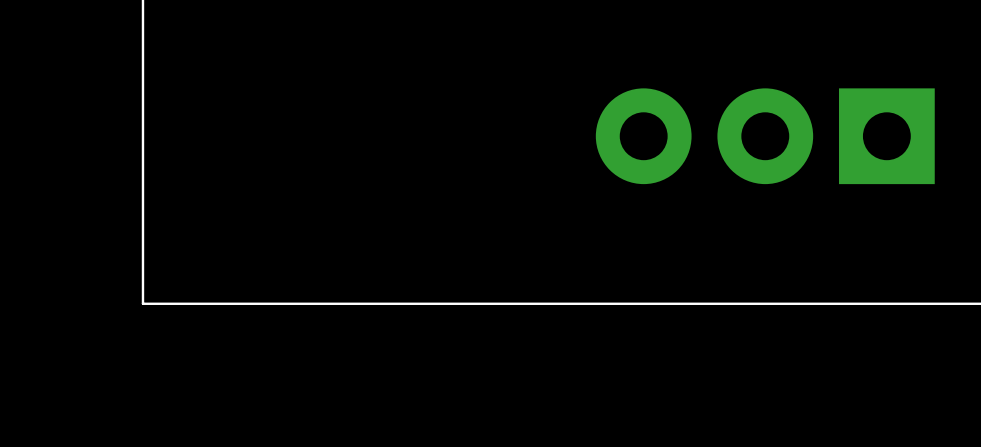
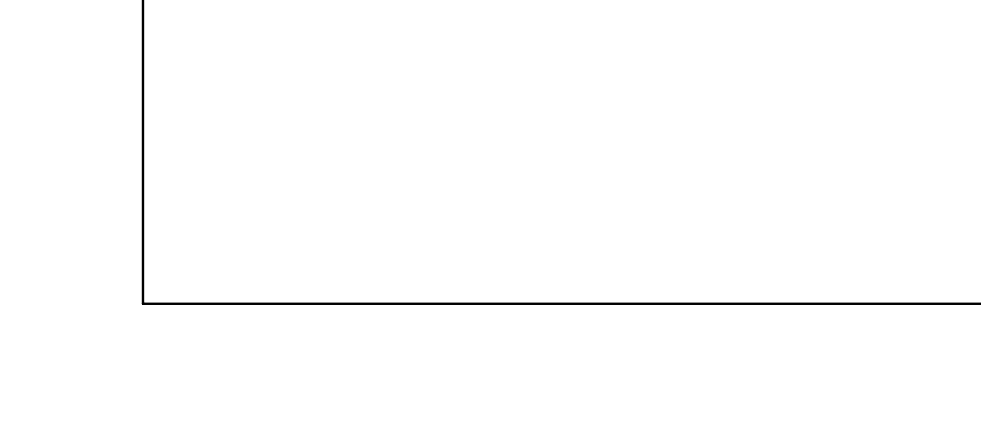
part: (765, 136) -> none

